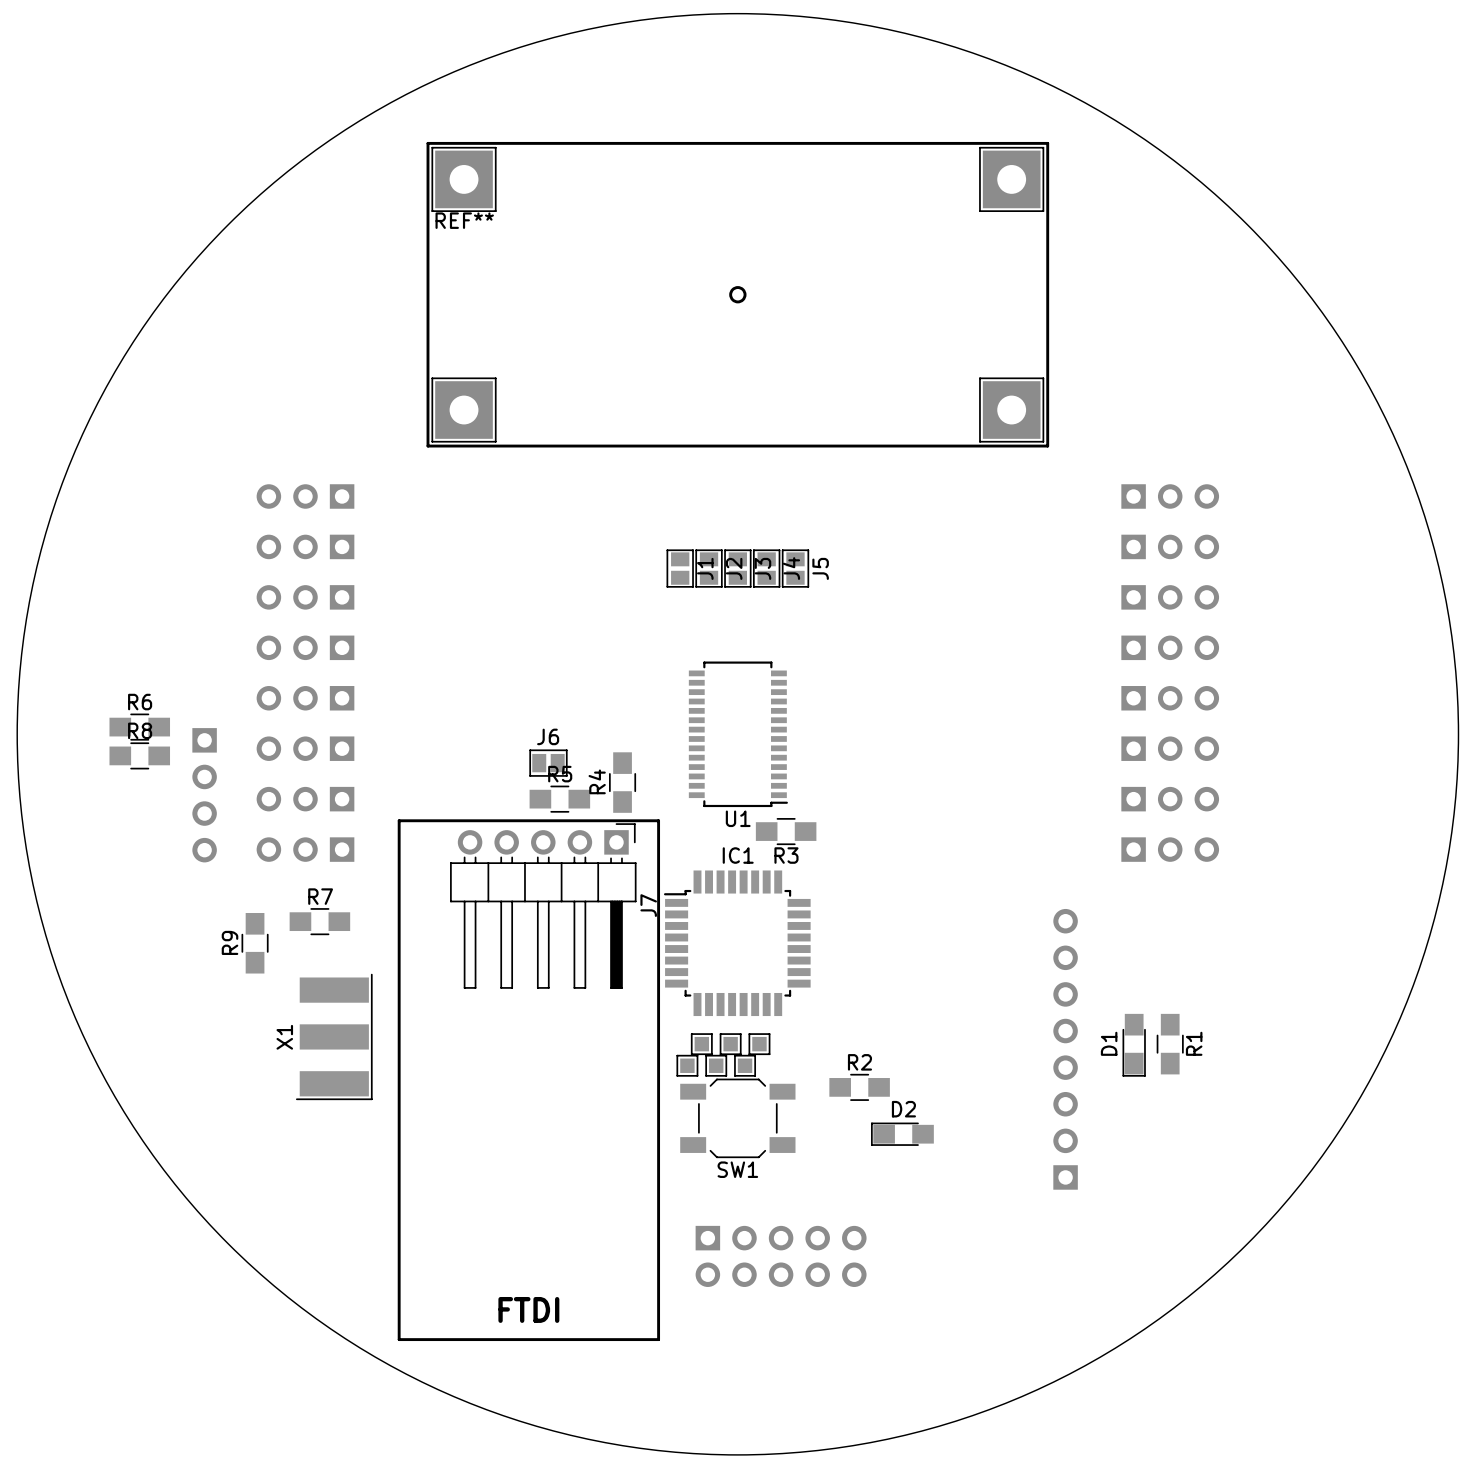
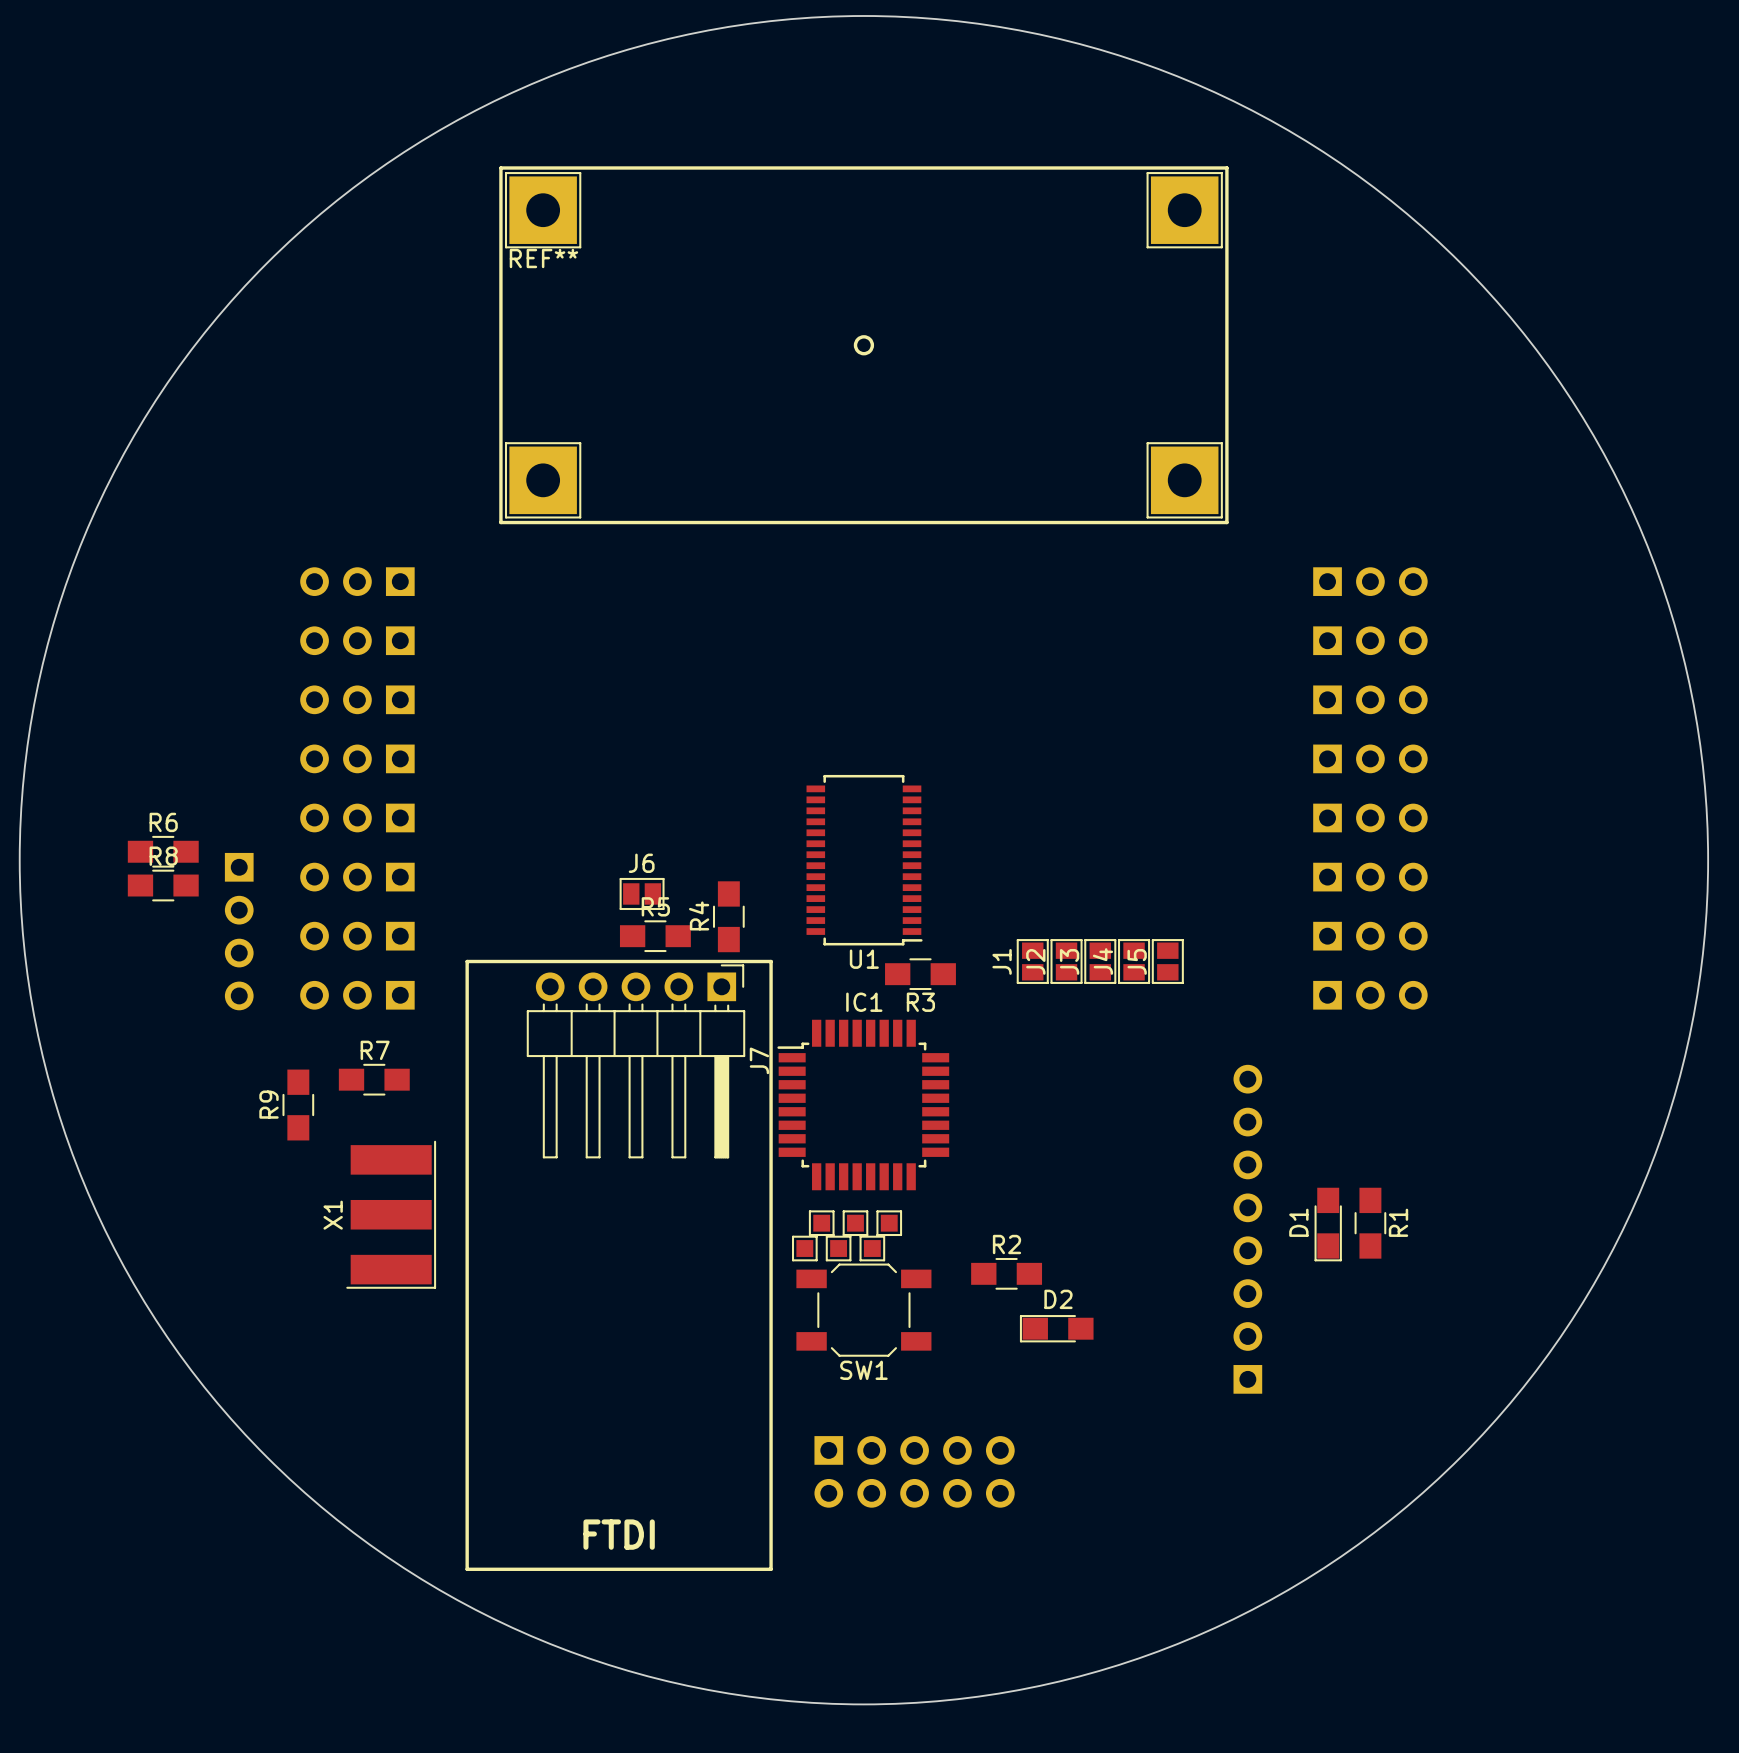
J1 position: (680, 568) -> (1032, 961)
J1 name position: J1 (705, 568) -> J1 (1002, 961)
J2 position: (709, 568) -> (1066, 961)
J2 name position: J2 (734, 568) -> J2 (1035, 961)
J3 position: (737, 568) -> (1100, 961)
J3 name position: J3 (762, 568) -> J3 (1069, 961)
J4 position: (766, 568) -> (1134, 961)
J4 name position: J4 (791, 568) -> J4 (1102, 961)
J5 position: (795, 568) -> (1167, 961)
J5 name position: J5 (820, 568) -> J5 (1137, 961)

